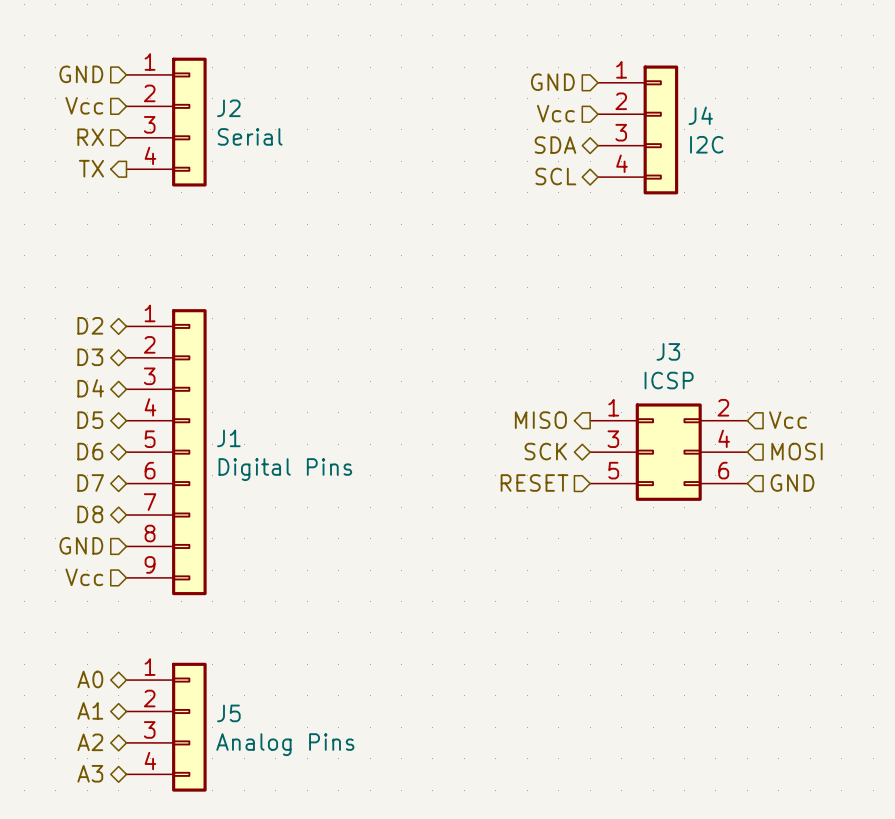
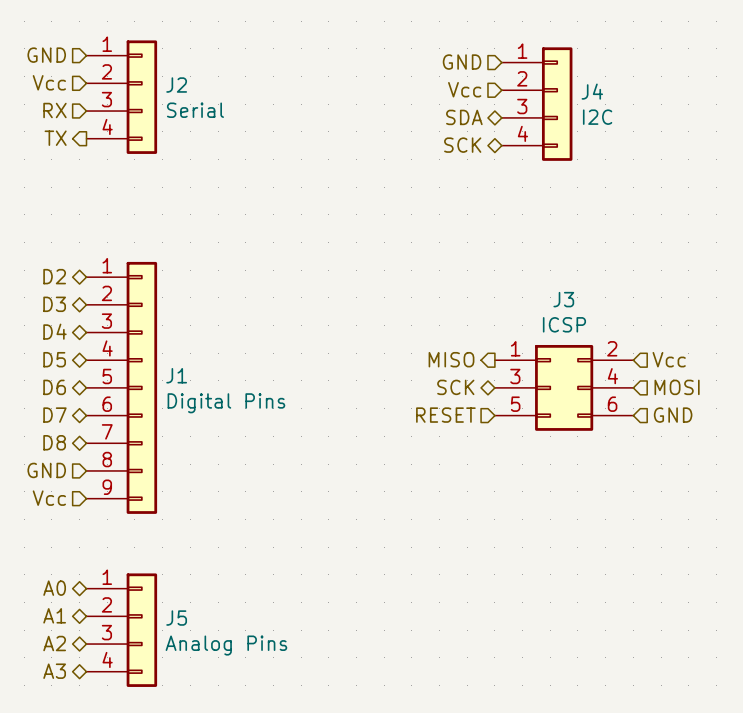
hierarchical label: SCL (555, 176) -> SCK (462, 145)

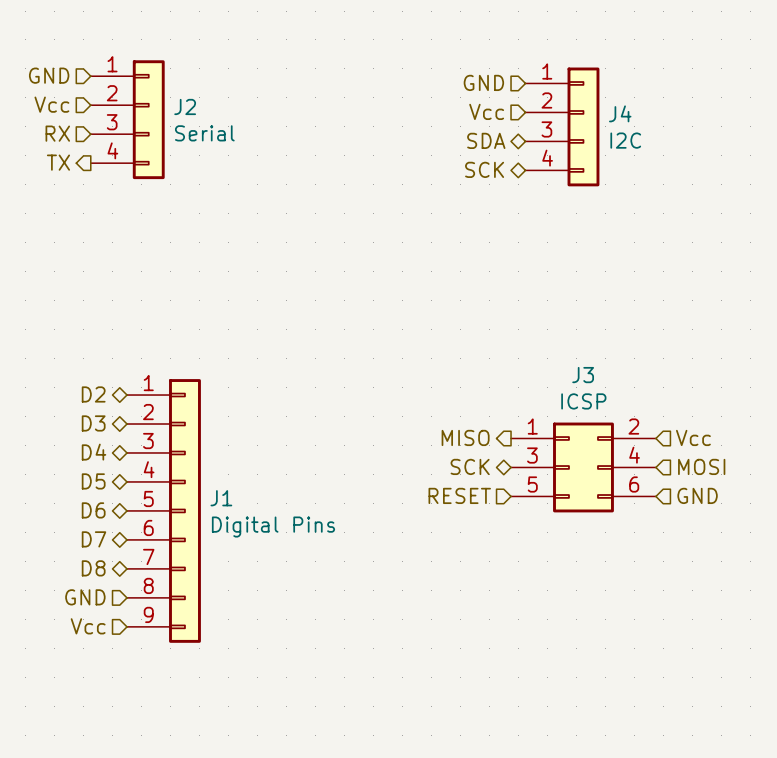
hierarchical label position: D2 (54, 276) -> D2 (93, 394)
hierarchical label position: D3 (54, 304) -> D3 (93, 423)
hierarchical label position: D4 (54, 331) -> D4 (94, 452)
hierarchical label position: D5 (54, 359) -> D5 (93, 481)
hierarchical label position: MISO (451, 359) -> MISO (465, 437)
hierarchical label position: Vcc (669, 359) -> Vcc (693, 437)
hierarchical label position: D6 (54, 387) -> D6 (93, 510)
J1 position: (121, 387) -> (163, 510)
hierarchical label position: SCK (455, 387) -> SCK (470, 466)
J3 position: (564, 387) -> (583, 467)
hierarchical label position: MOSI (677, 387) -> MOSI (701, 466)
hierarchical label position: D7 (54, 415) -> D7 (94, 539)
hierarchical label position: RESET (445, 415) -> RESET (459, 495)
hierarchical label position: GND (673, 415) -> GND (697, 495)
hierarchical label position: D8 (54, 442) -> D8 (93, 568)
hierarchical label position: GND (46, 470) -> GND (85, 597)
hierarchical label position: Vcc (49, 498) -> Vcc (88, 626)
hierarchical label: A0 (54, 588) -> none
hierarchical label: A1 (54, 615) -> none
J5: Analog Pins (121, 630) -> none
hierarchical label: A2 (54, 643) -> none
hierarchical label: A3 (54, 671) -> none

